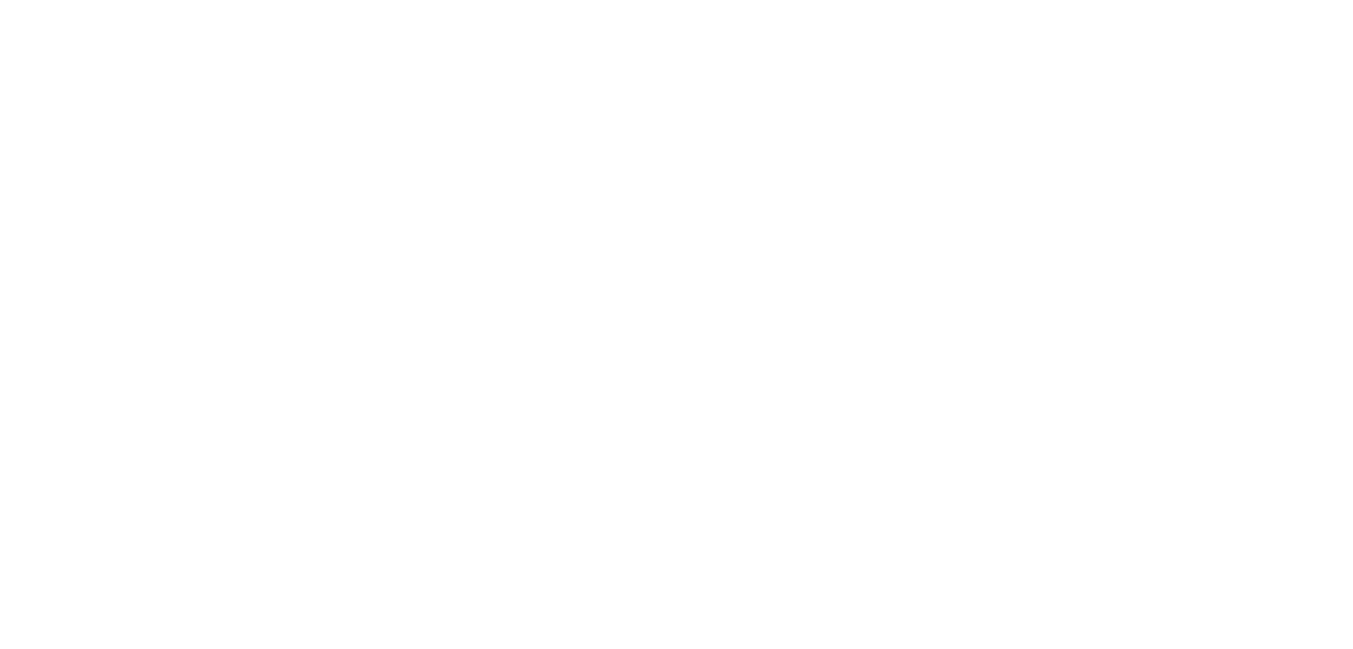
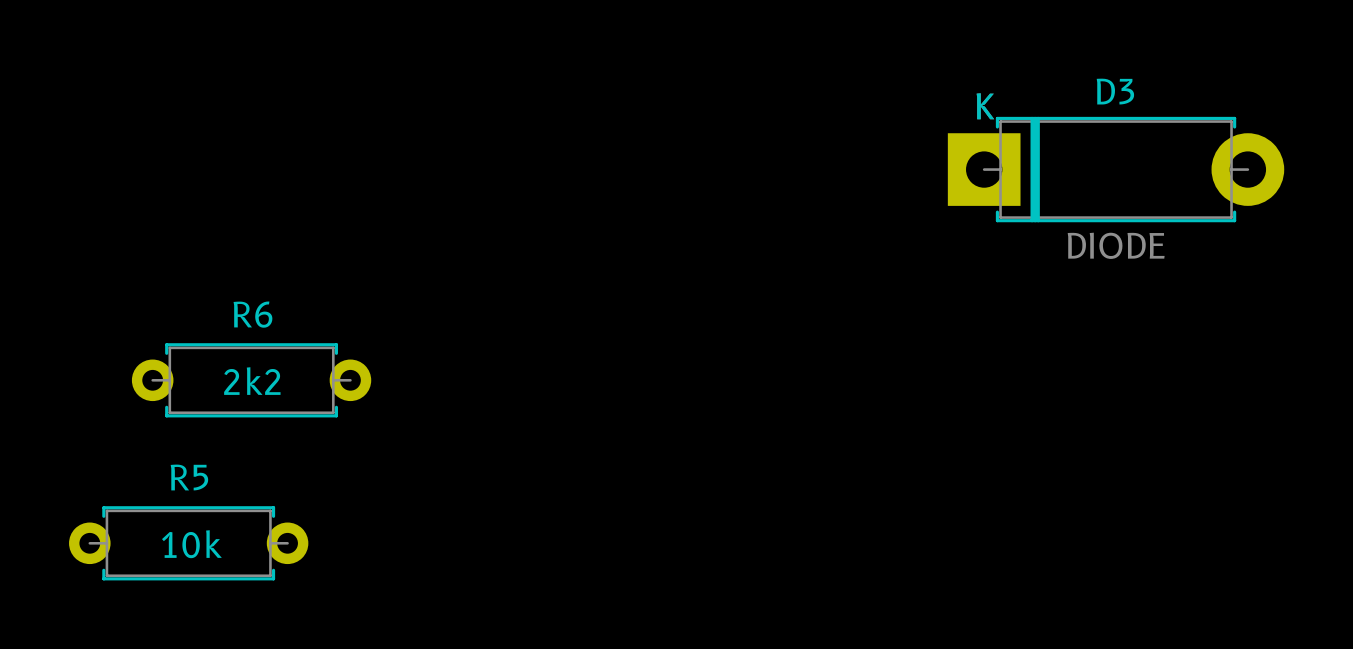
D3: none -> DIODE (1116, 169)
R6: none -> 2k2 (251, 380)
R5: none -> 10k (188, 543)

